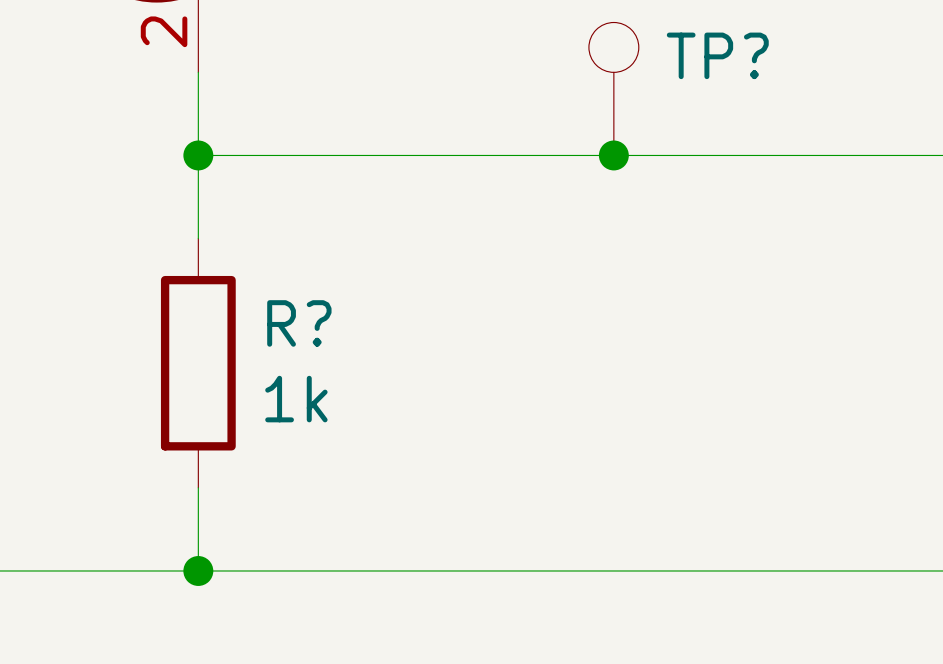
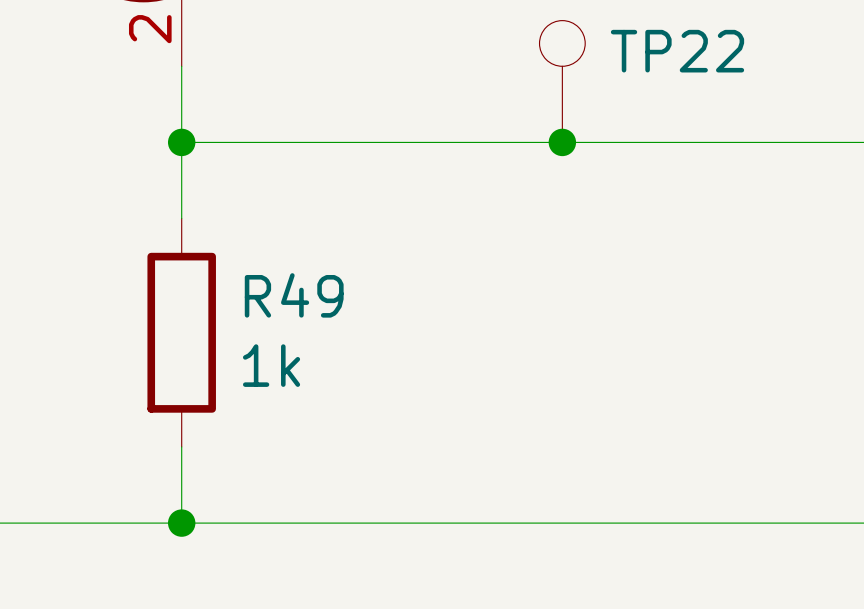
TP? name: TP? (717, 55) -> TP22 (677, 51)
R? name: R? (299, 323) -> R49 (294, 295)

